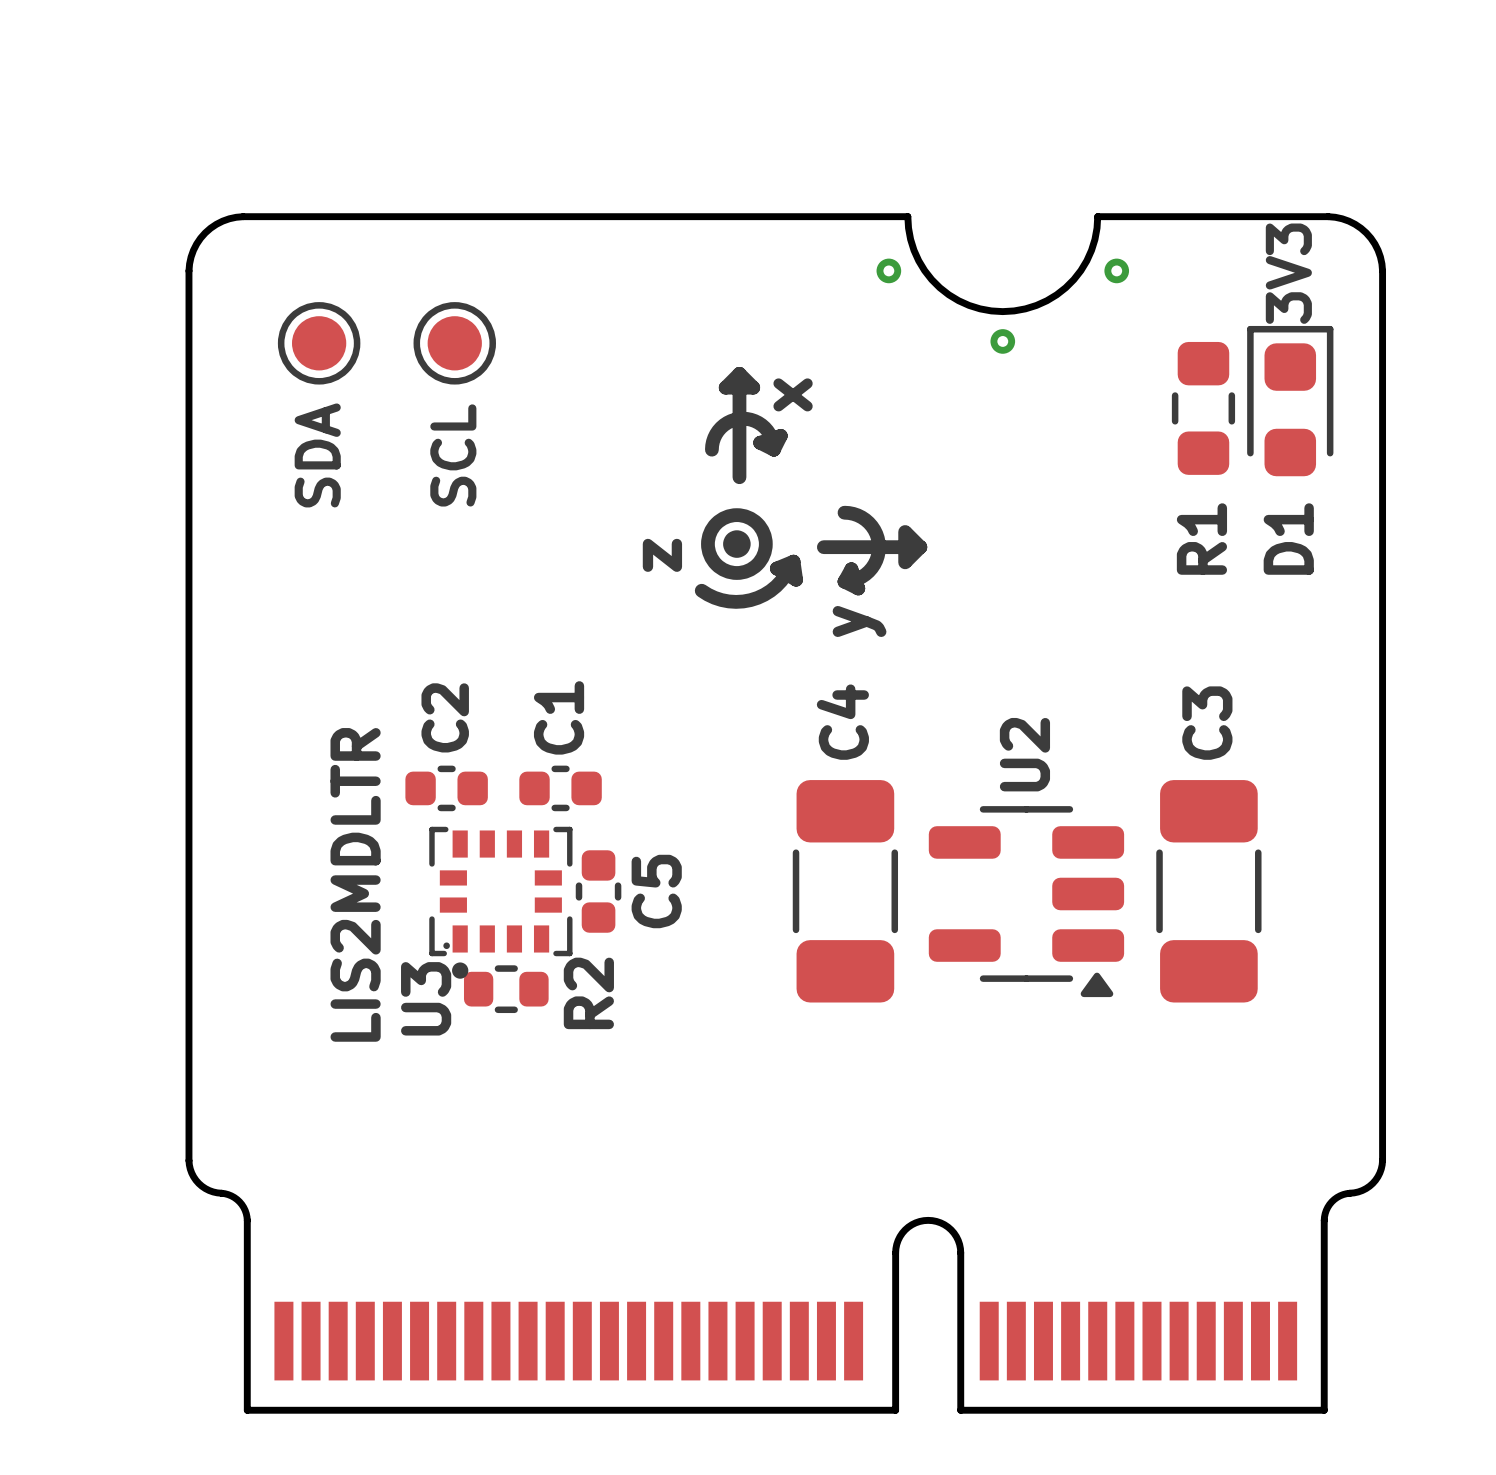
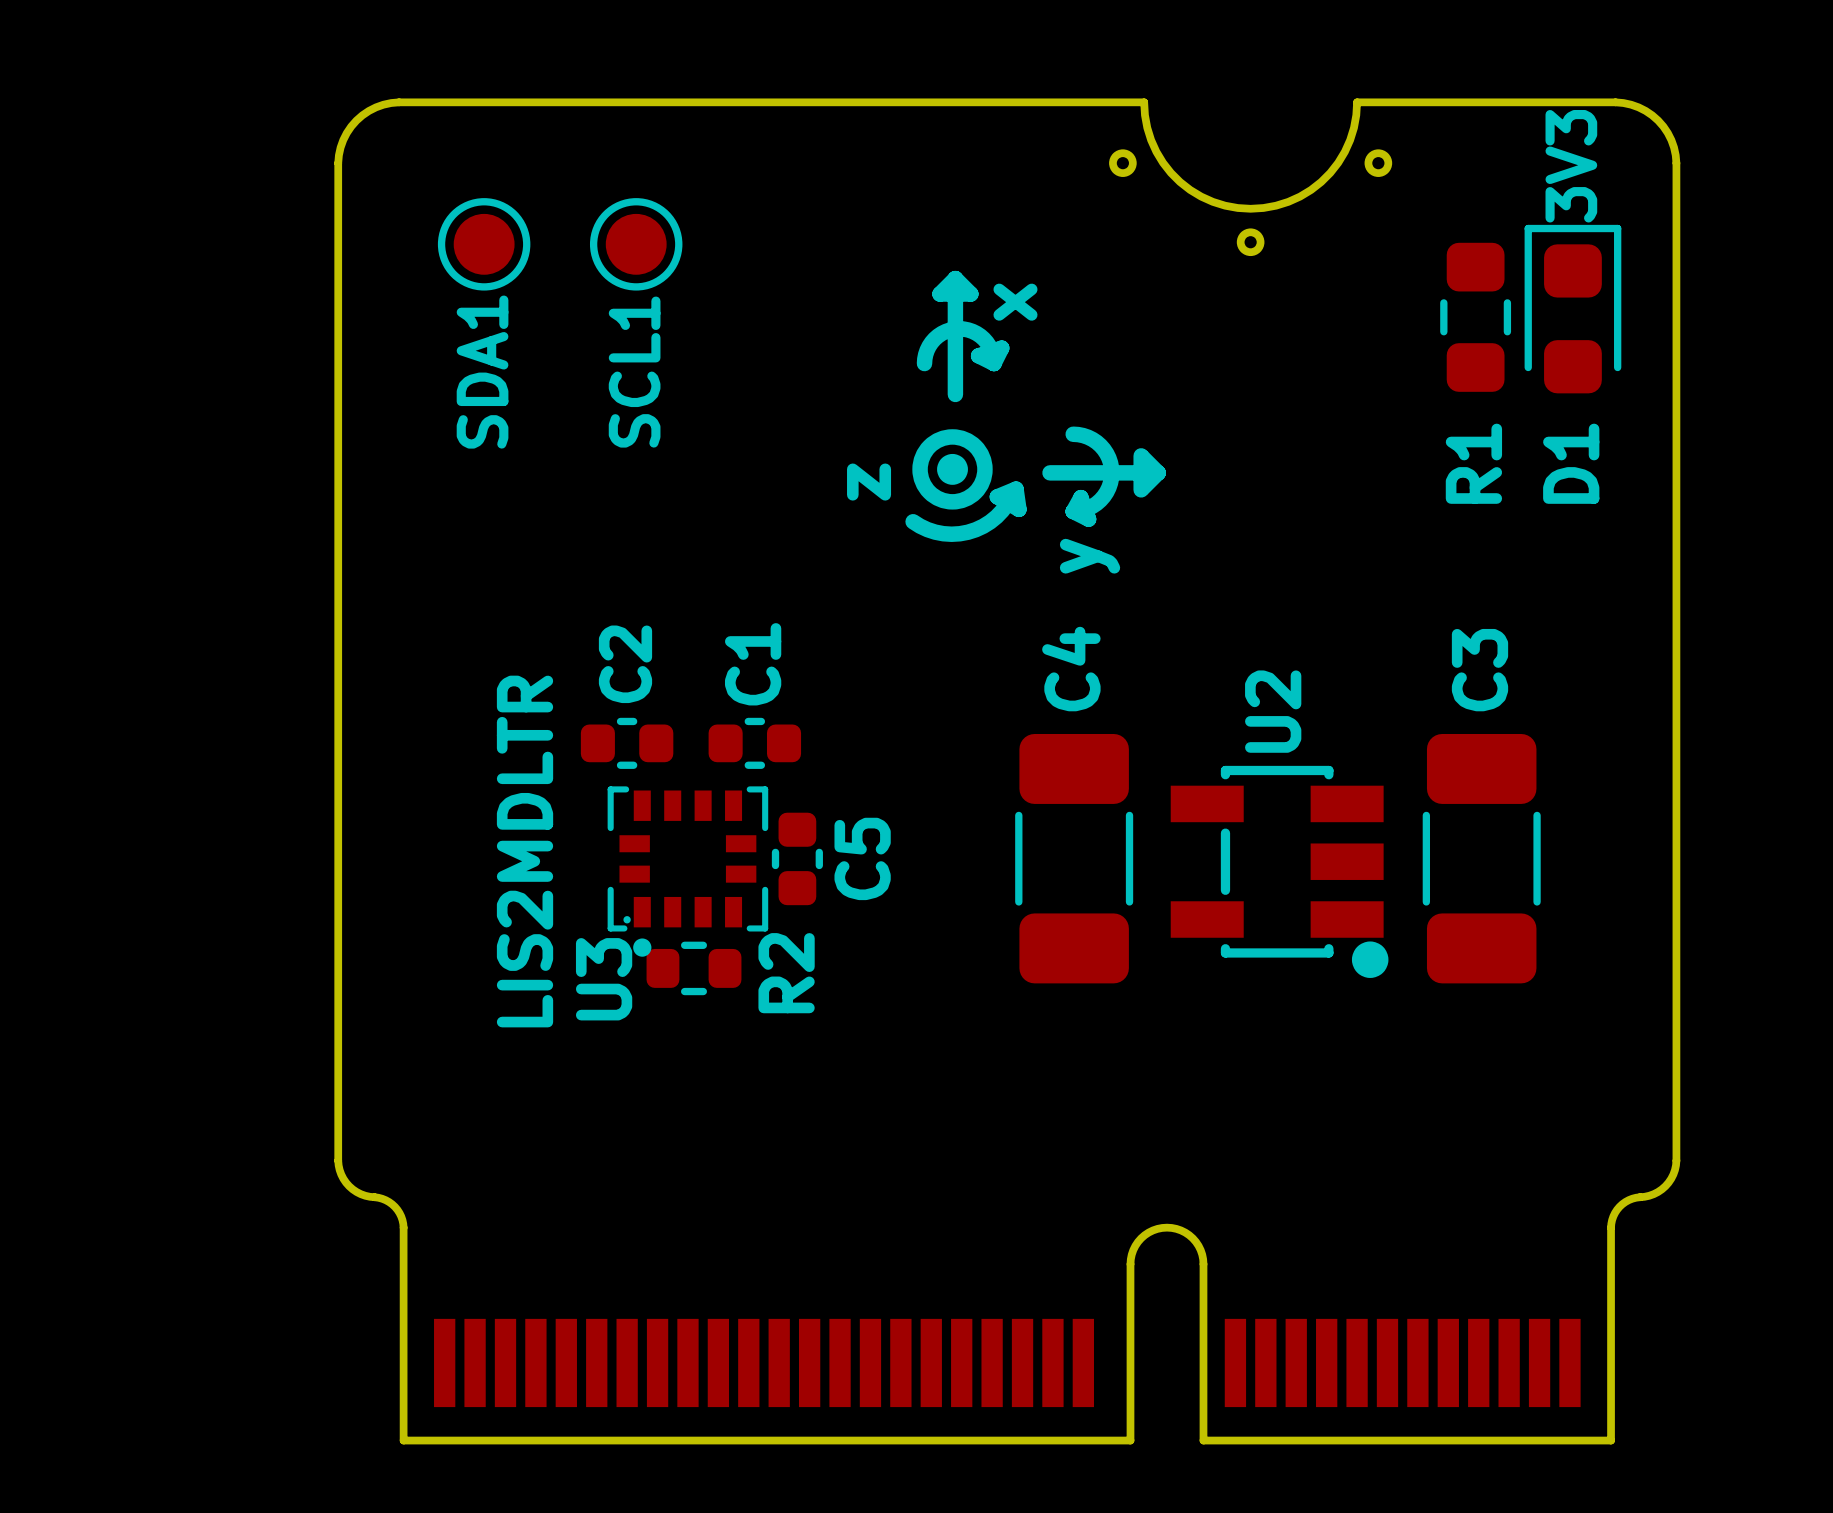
SDA name: SDA (317, 455) -> SDA1 (482, 372)
SCL name: SCL (453, 455) -> SCL1 (634, 372)
U2 footprint: [928, 806, 1125, 998] -> [1170, 765, 1389, 978]

